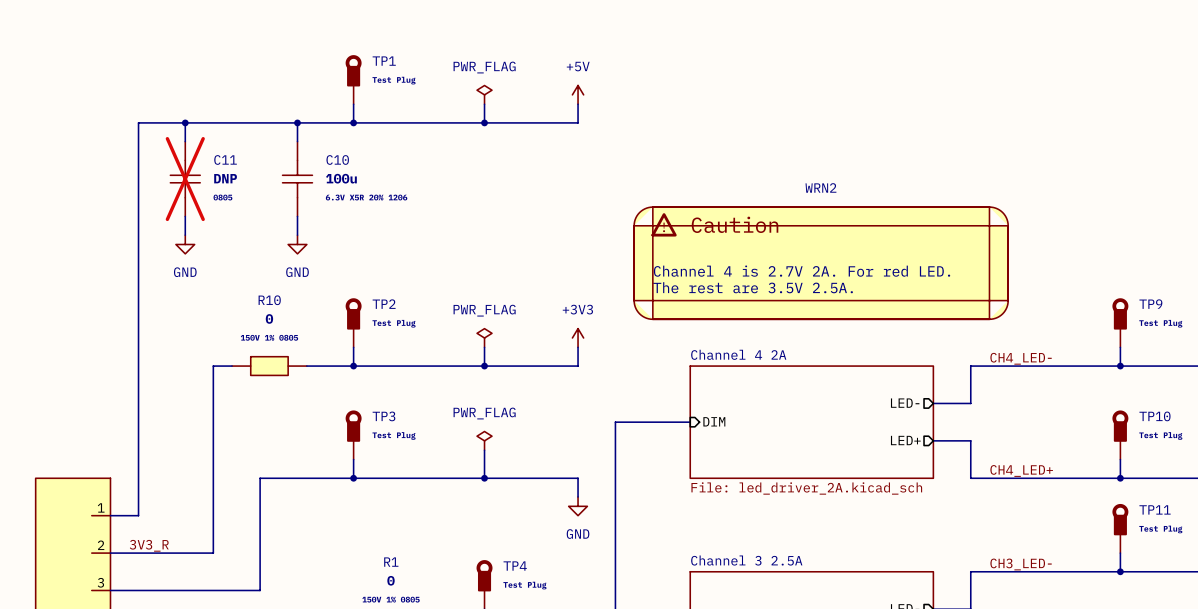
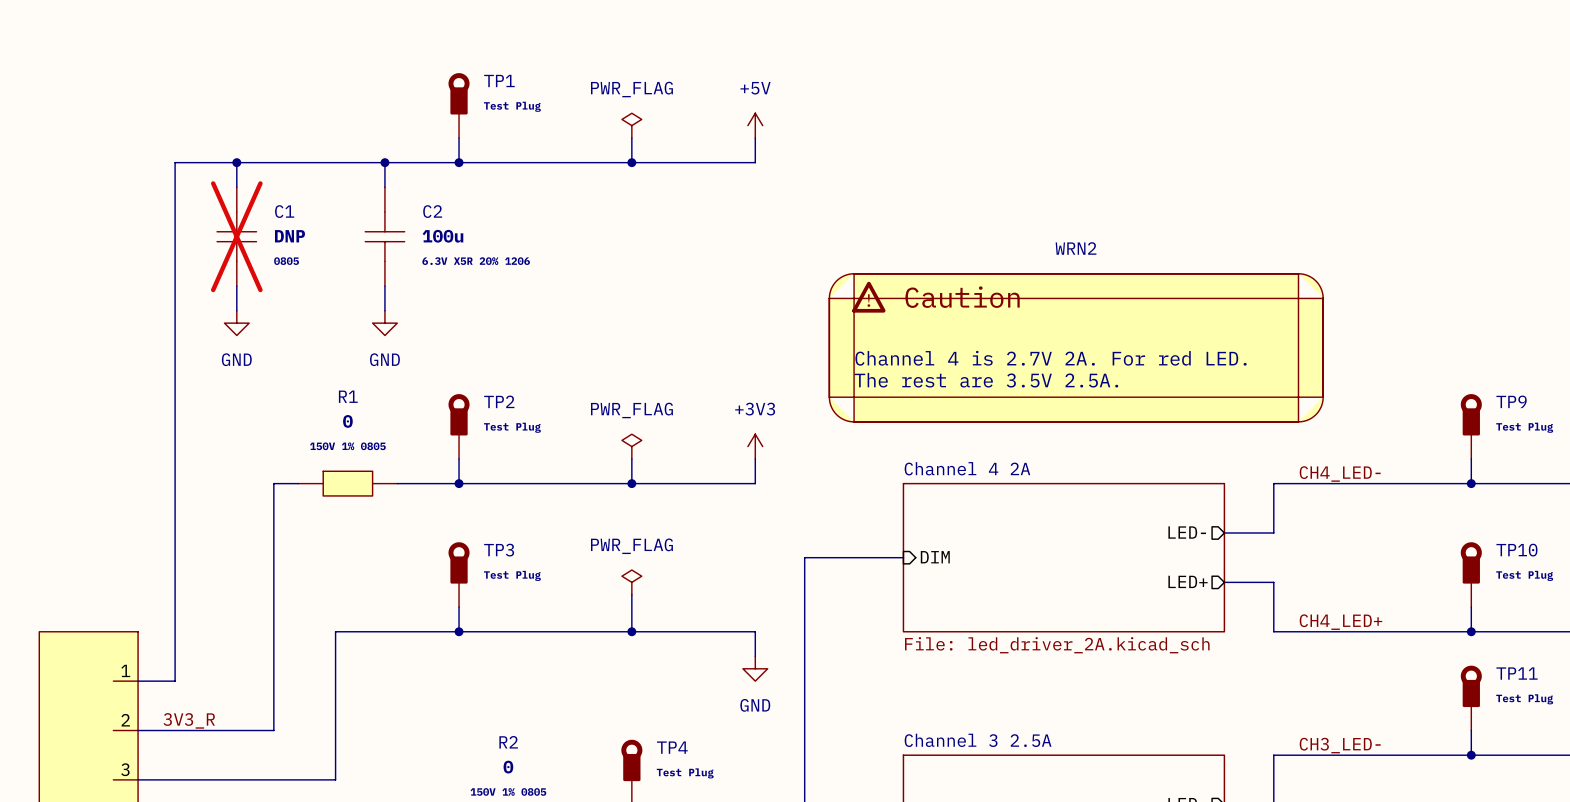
C11 name: C11 (225, 159) -> C1 (284, 211)
C10 name: C10 (337, 159) -> C2 (432, 211)
R10 name: R10 (269, 300) -> R1 (348, 396)
R1 name: R1 (391, 562) -> R2 (508, 742)

